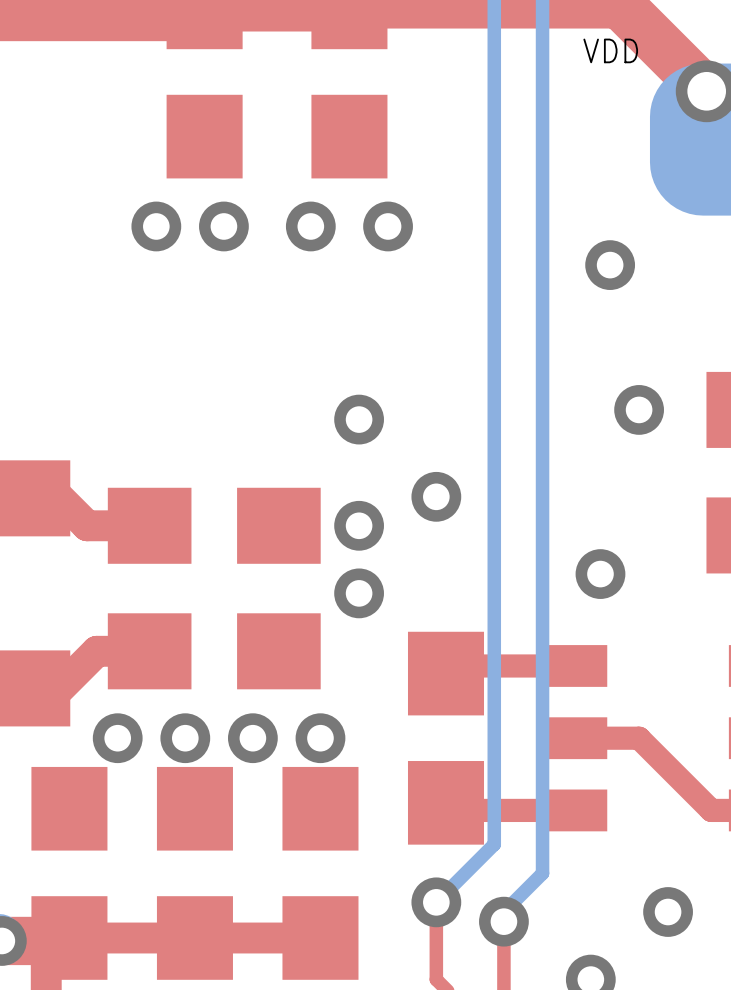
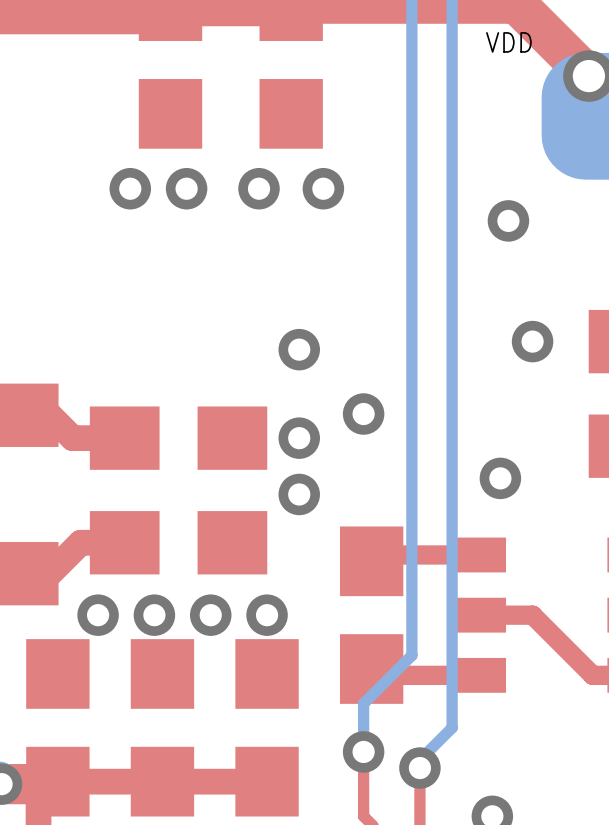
bottom track: (494, 786) (494, 844) (436, 902) -> (411, 655) (363, 703) (363, 751)
via: (668, 912) -> none

